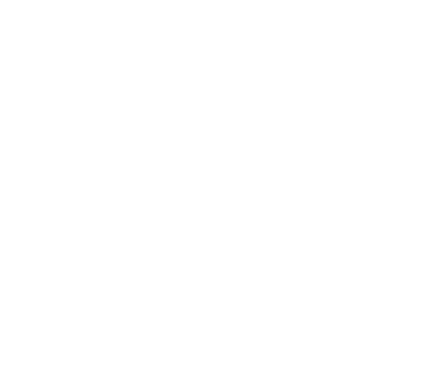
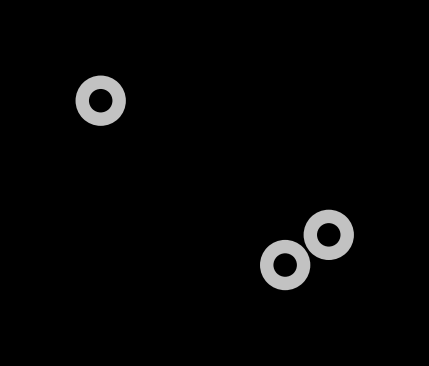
via: none -> (100, 100)
via: none -> (328, 234)
via: none -> (285, 265)

